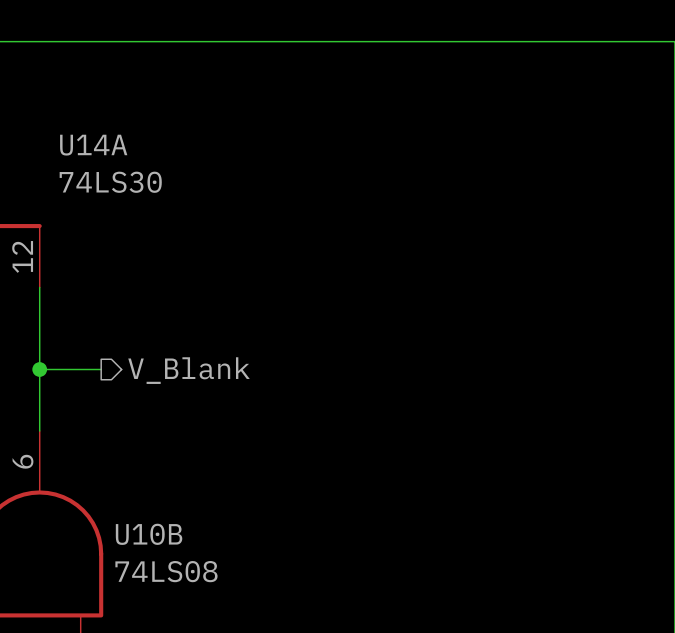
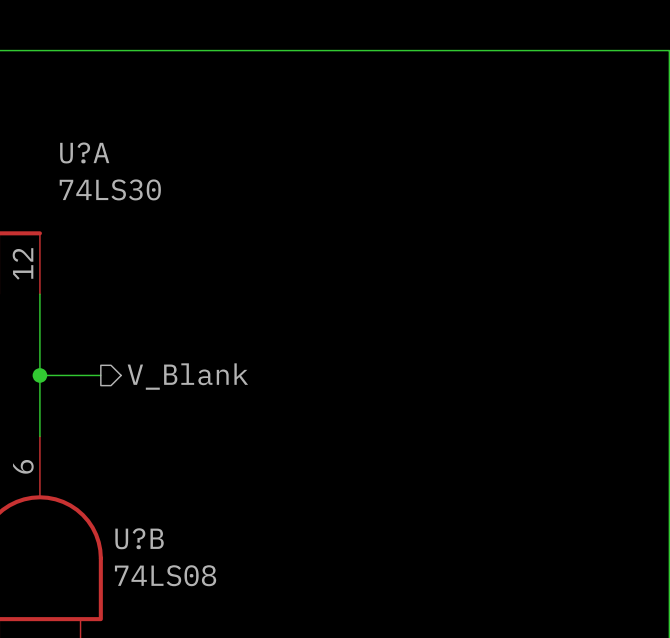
U14A name: U14A (93, 145) -> U?A (84, 152)
U10B name: U10B (149, 534) -> U?B (139, 538)

